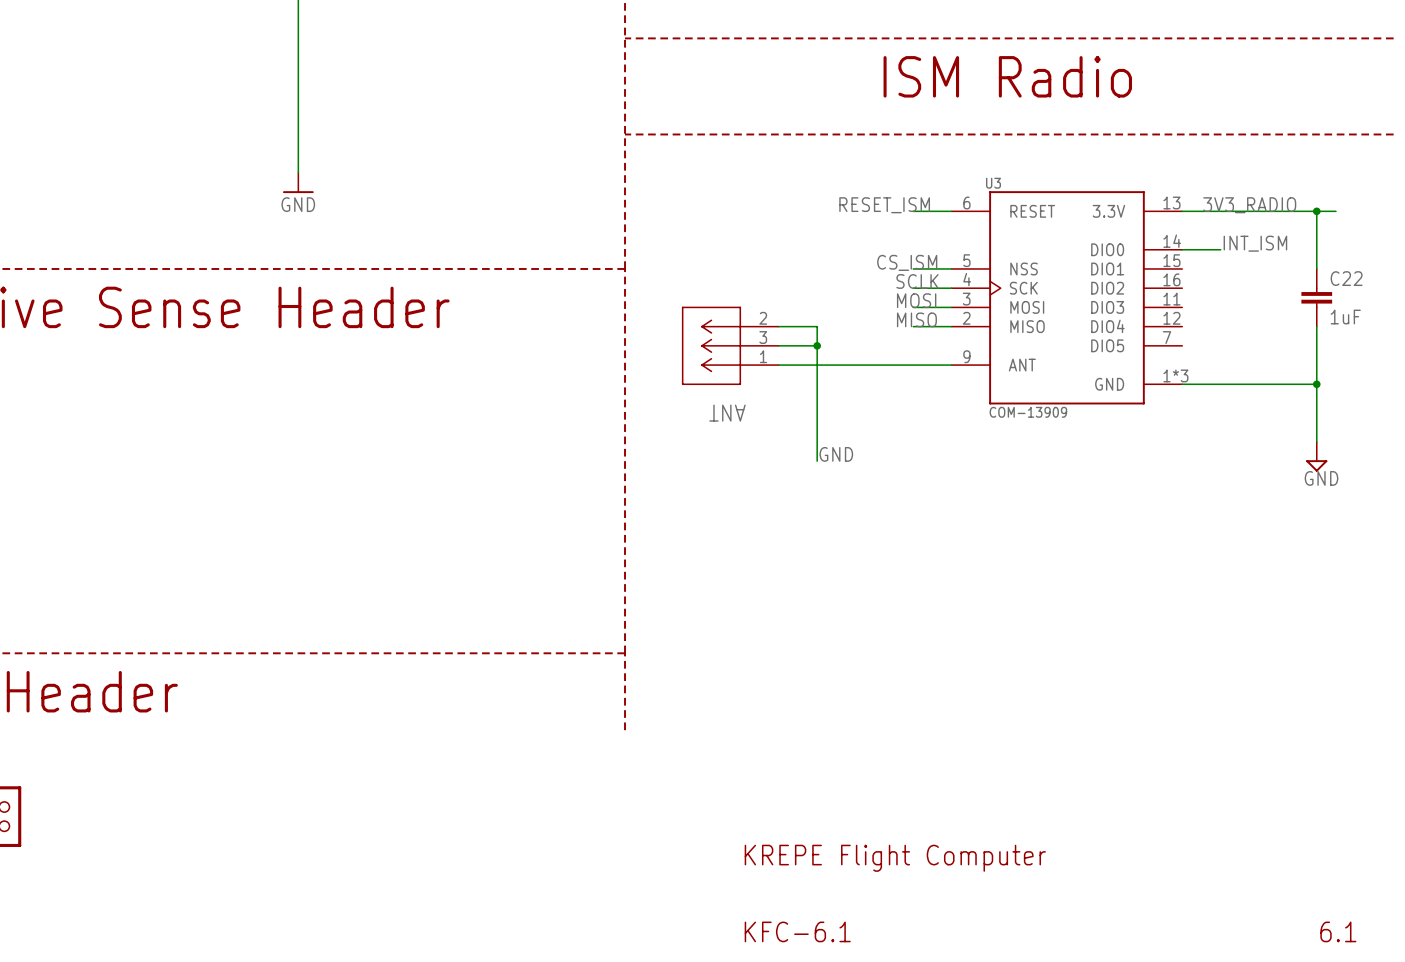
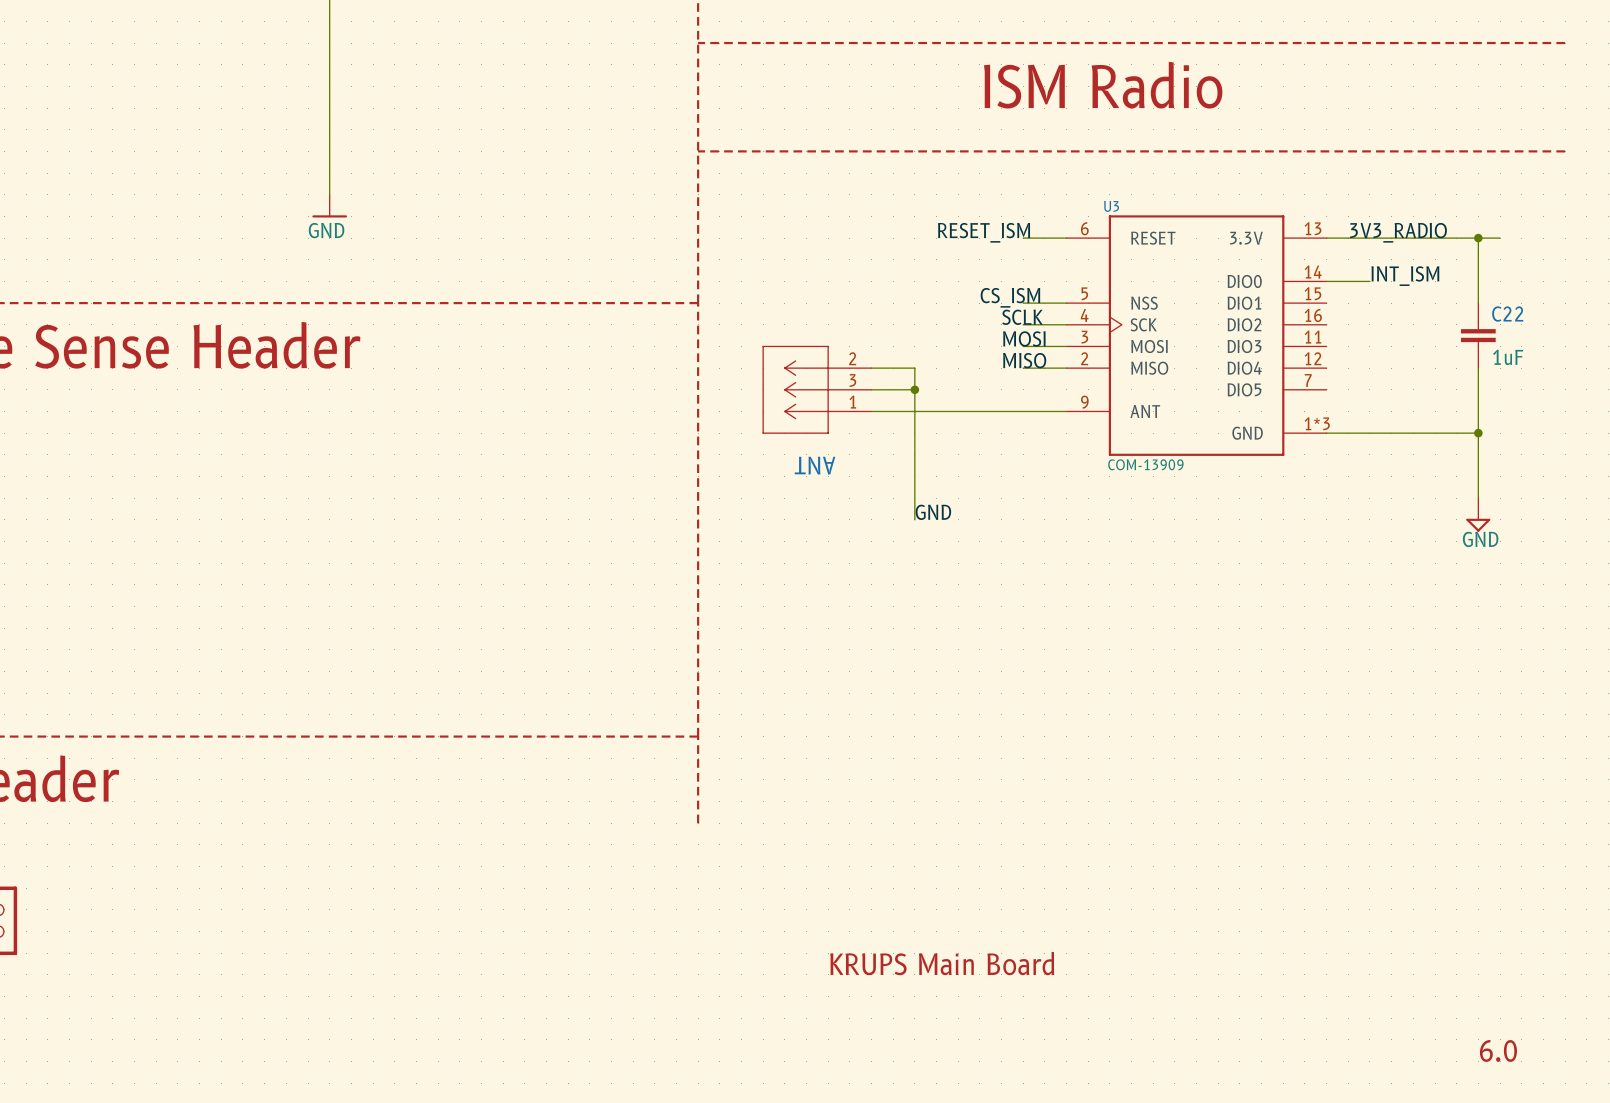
text: KREPE Flight Computer (895, 858) -> KRUPS Main Board (942, 963)
text: KFC-6.1 (797, 931) -> none
text: 6.1 (1338, 931) -> 6.0 (1498, 1050)

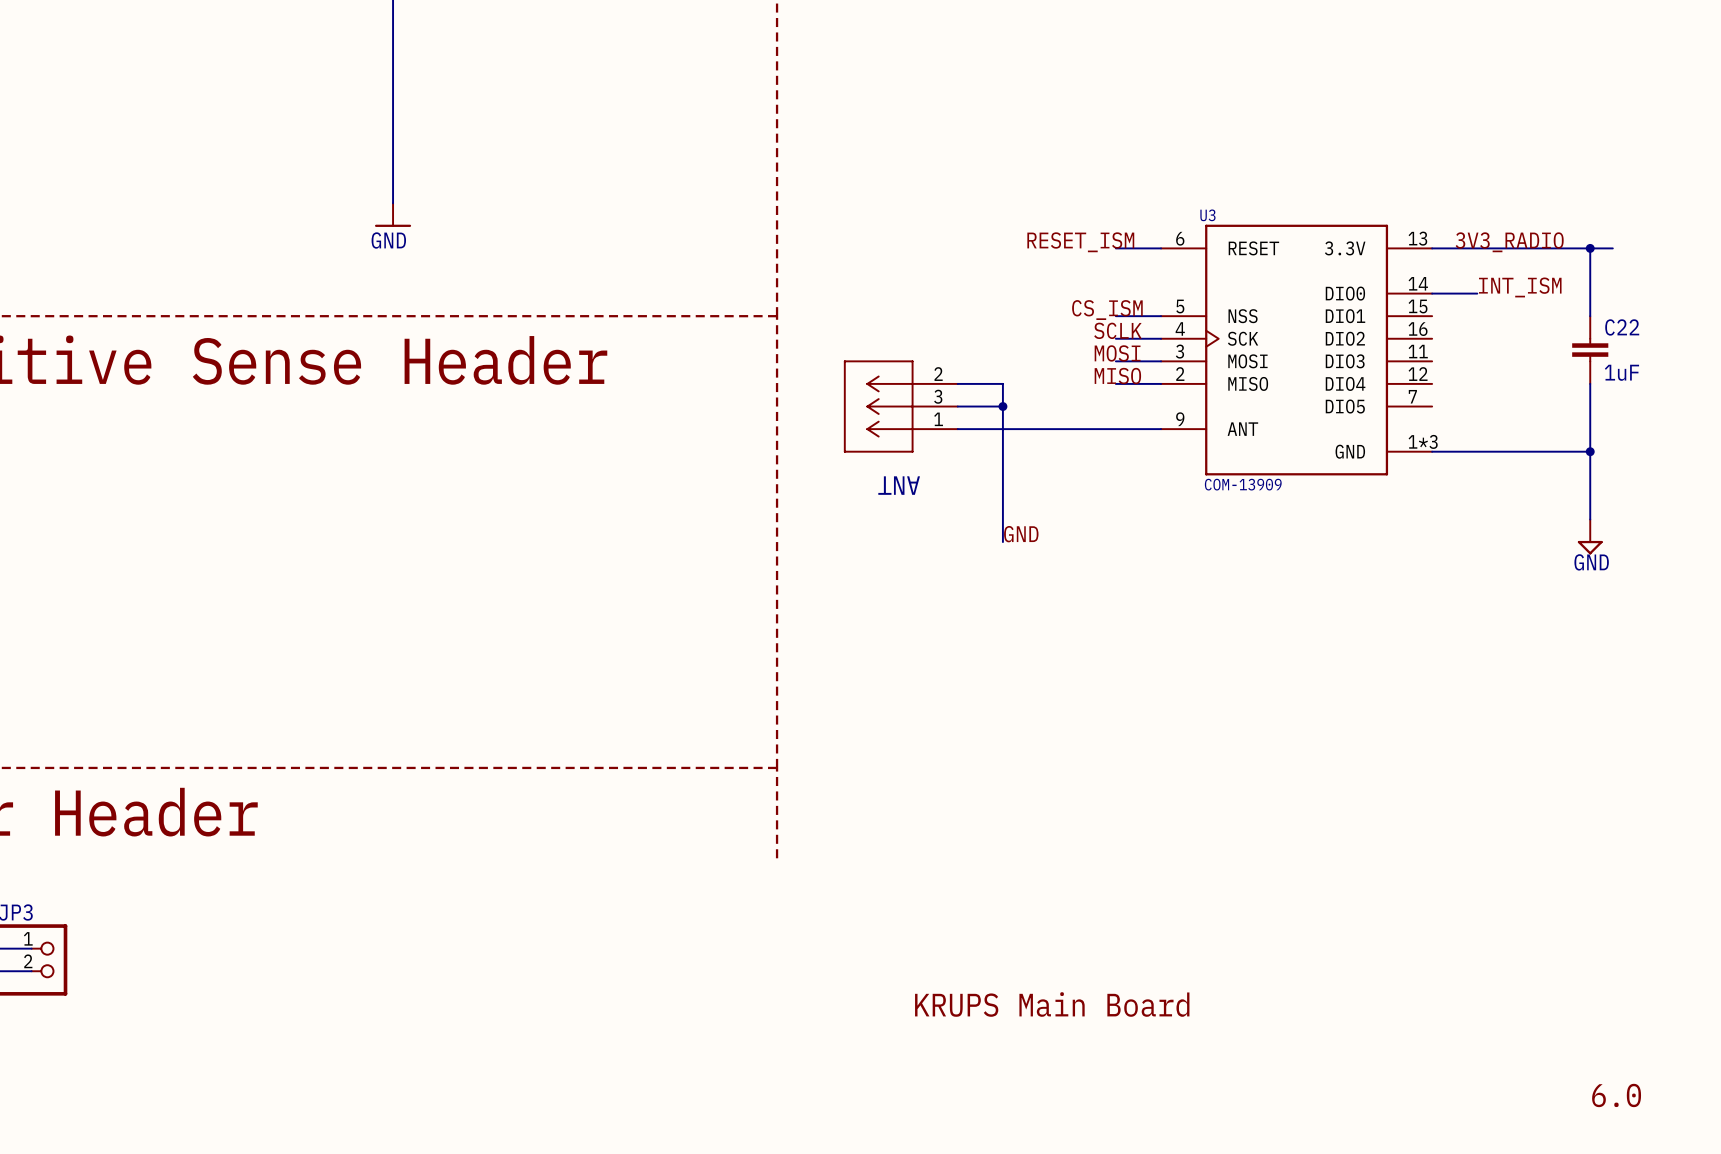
line: (698, 43) (1565, 43) -> none
text: ISM Radio (1103, 85) -> none
line: (698, 151) (1565, 151) -> none

